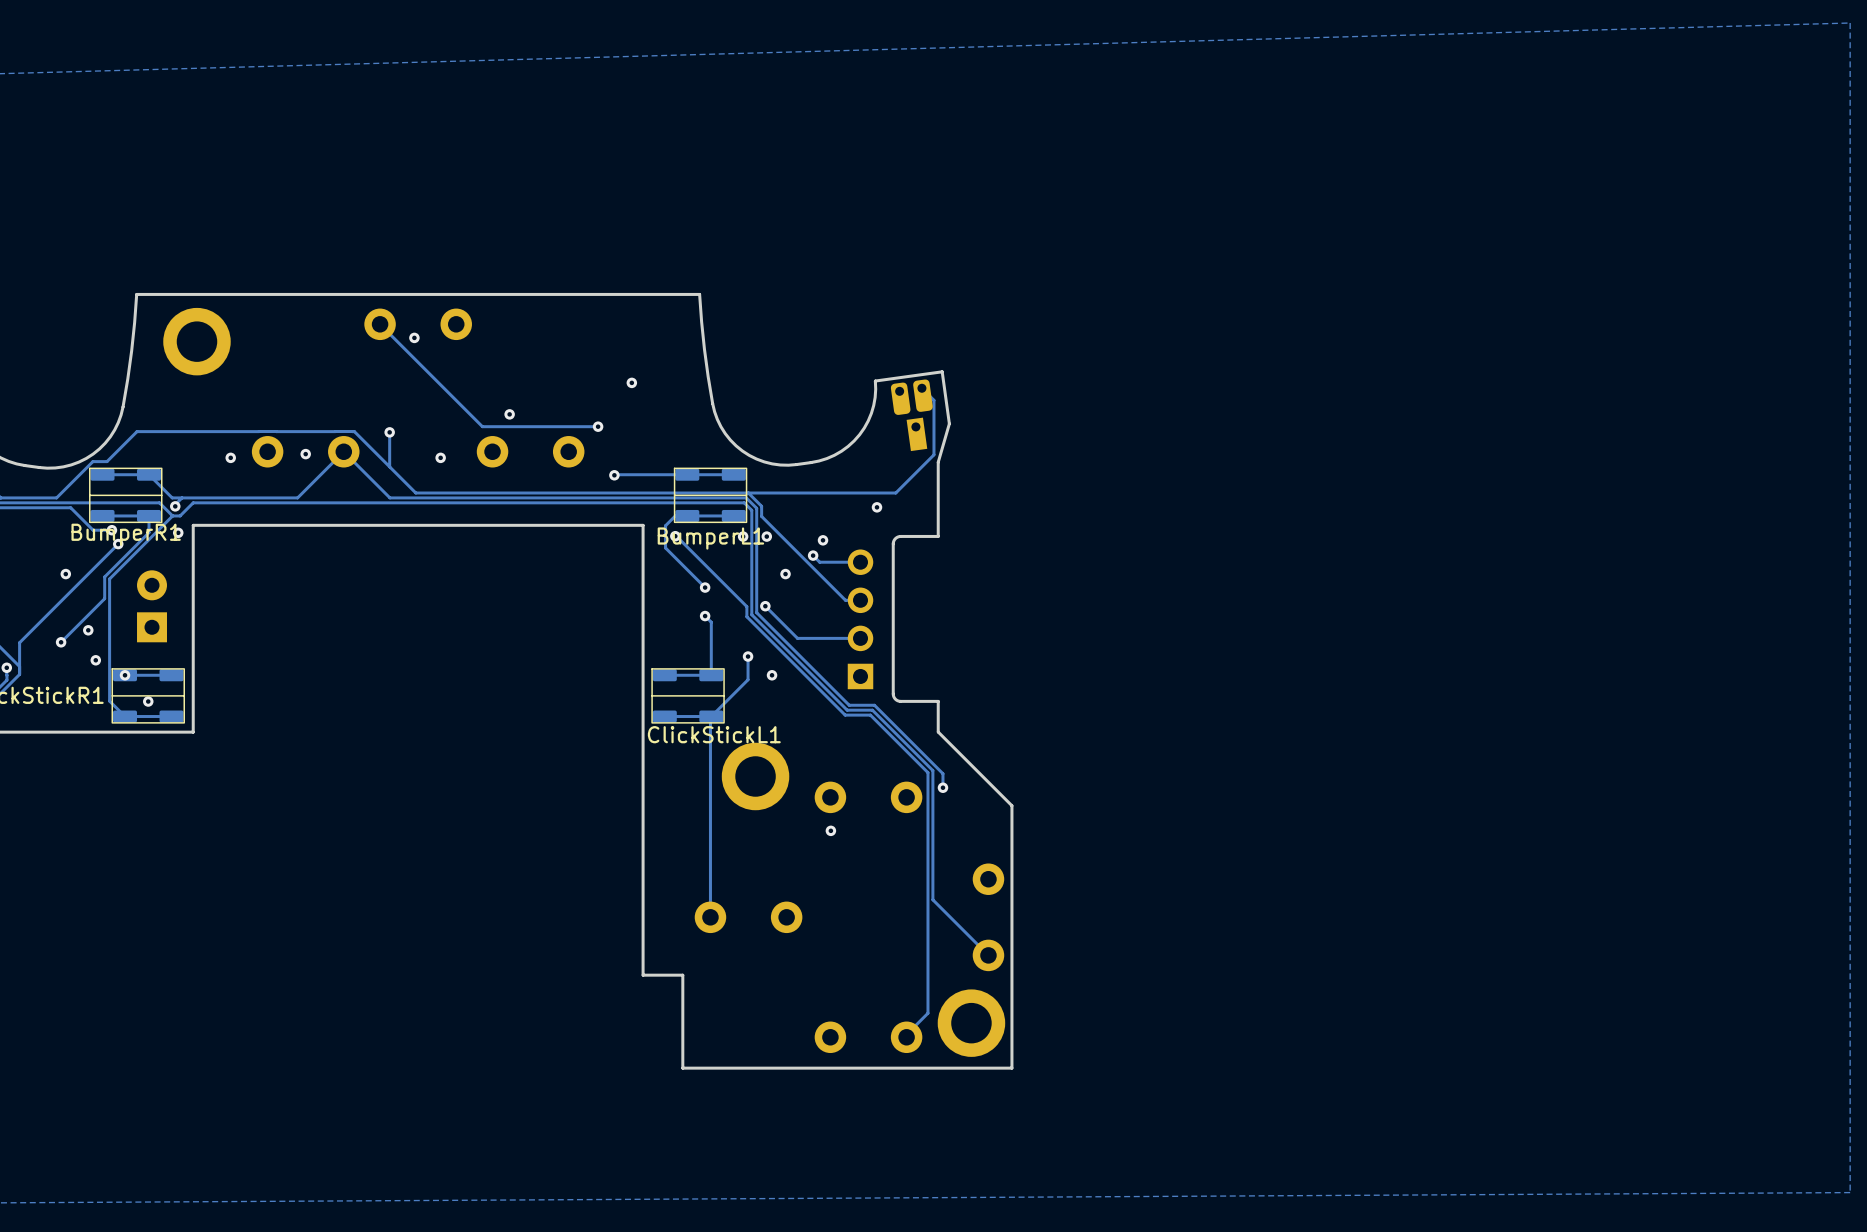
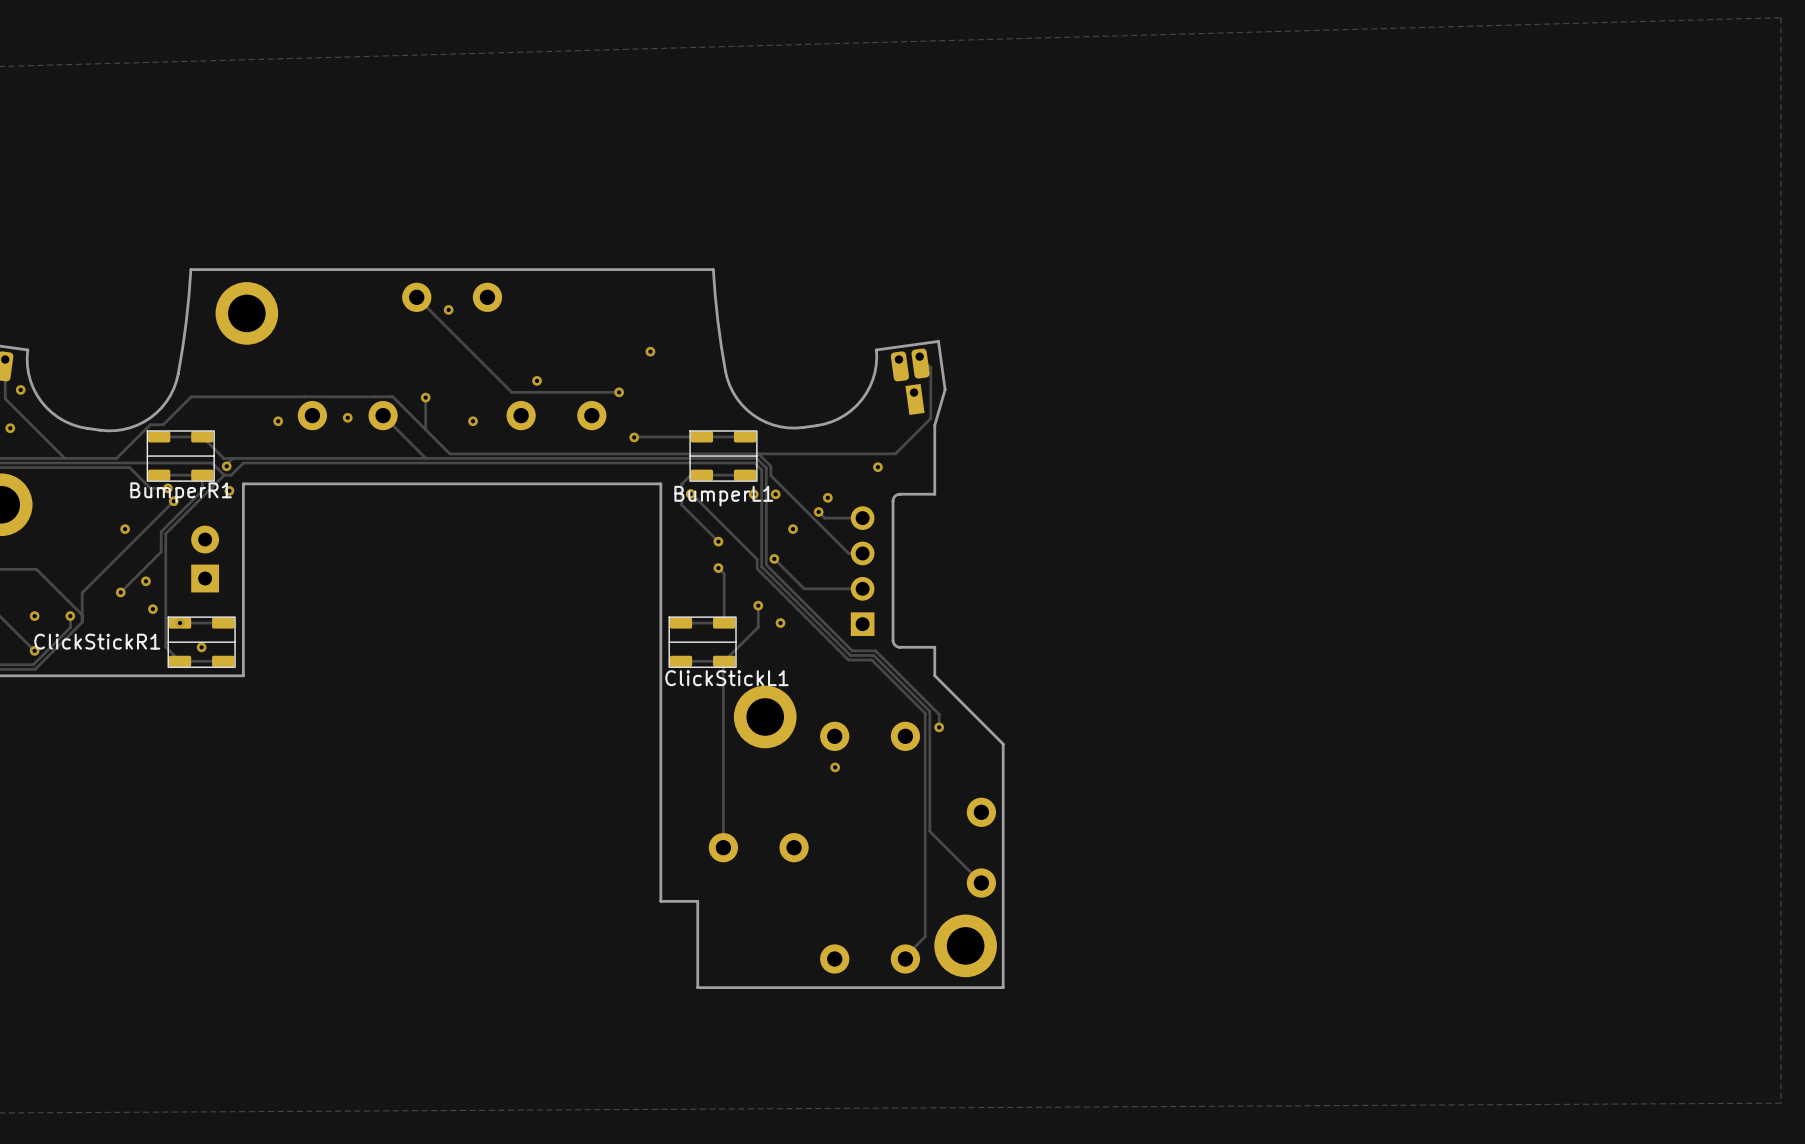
track: (343, 451) (297, 497) -> (425, 458) (340, 458)

